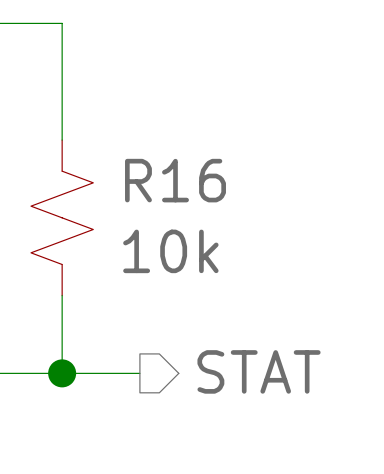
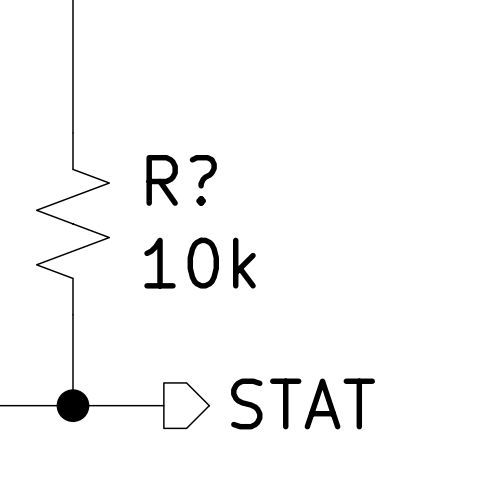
R16 name: R16 (175, 180) -> R? (181, 180)

